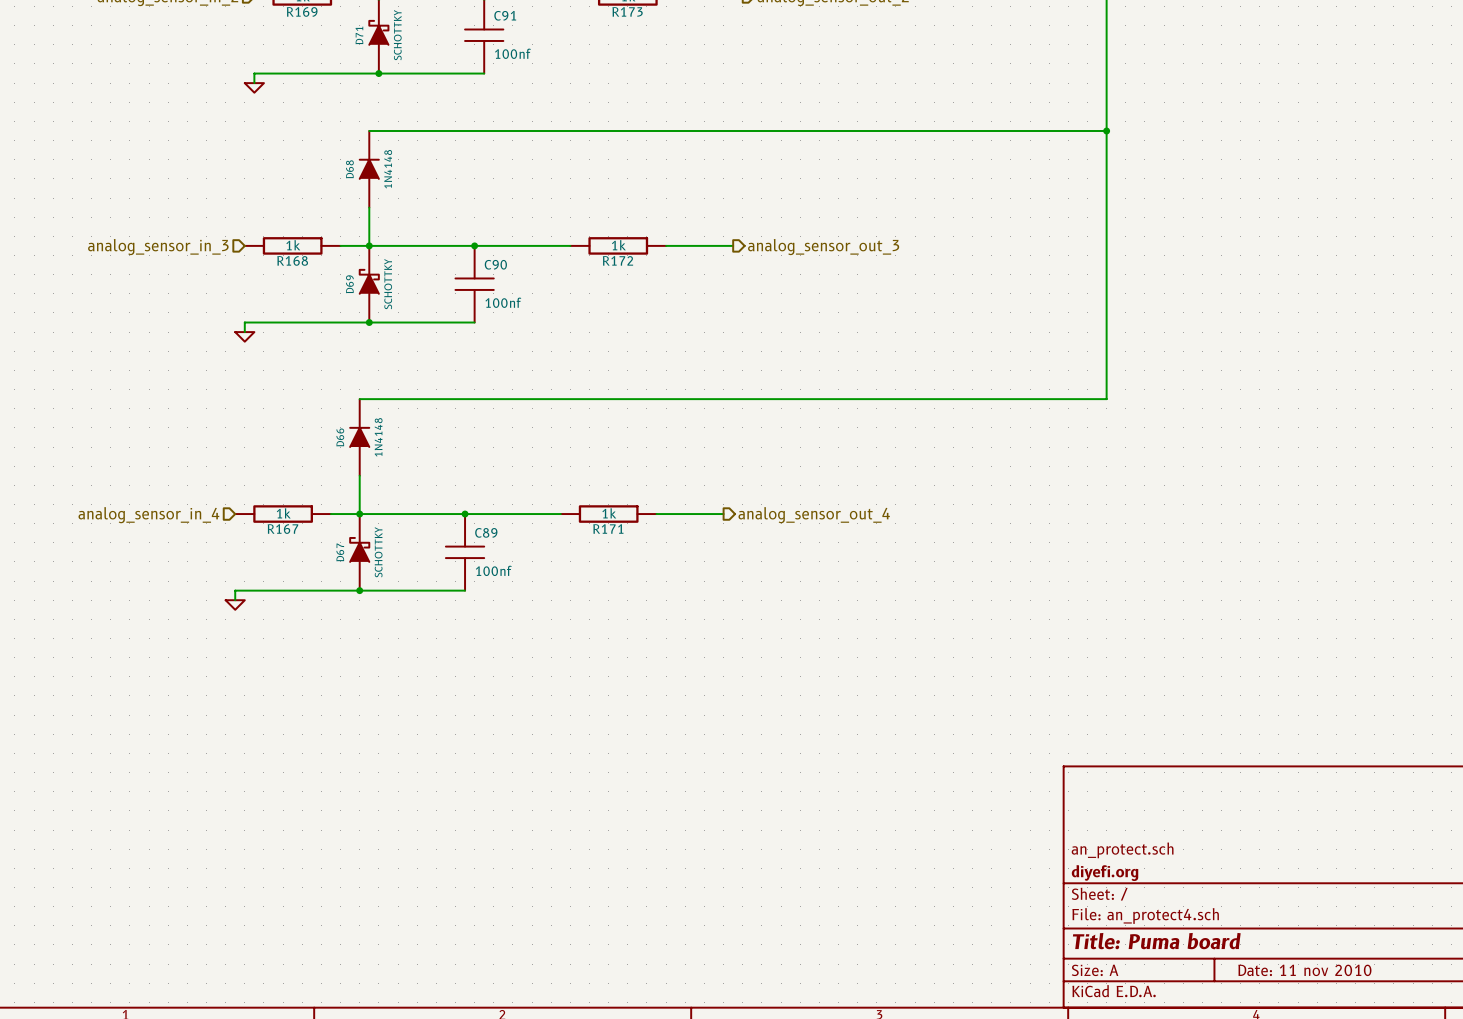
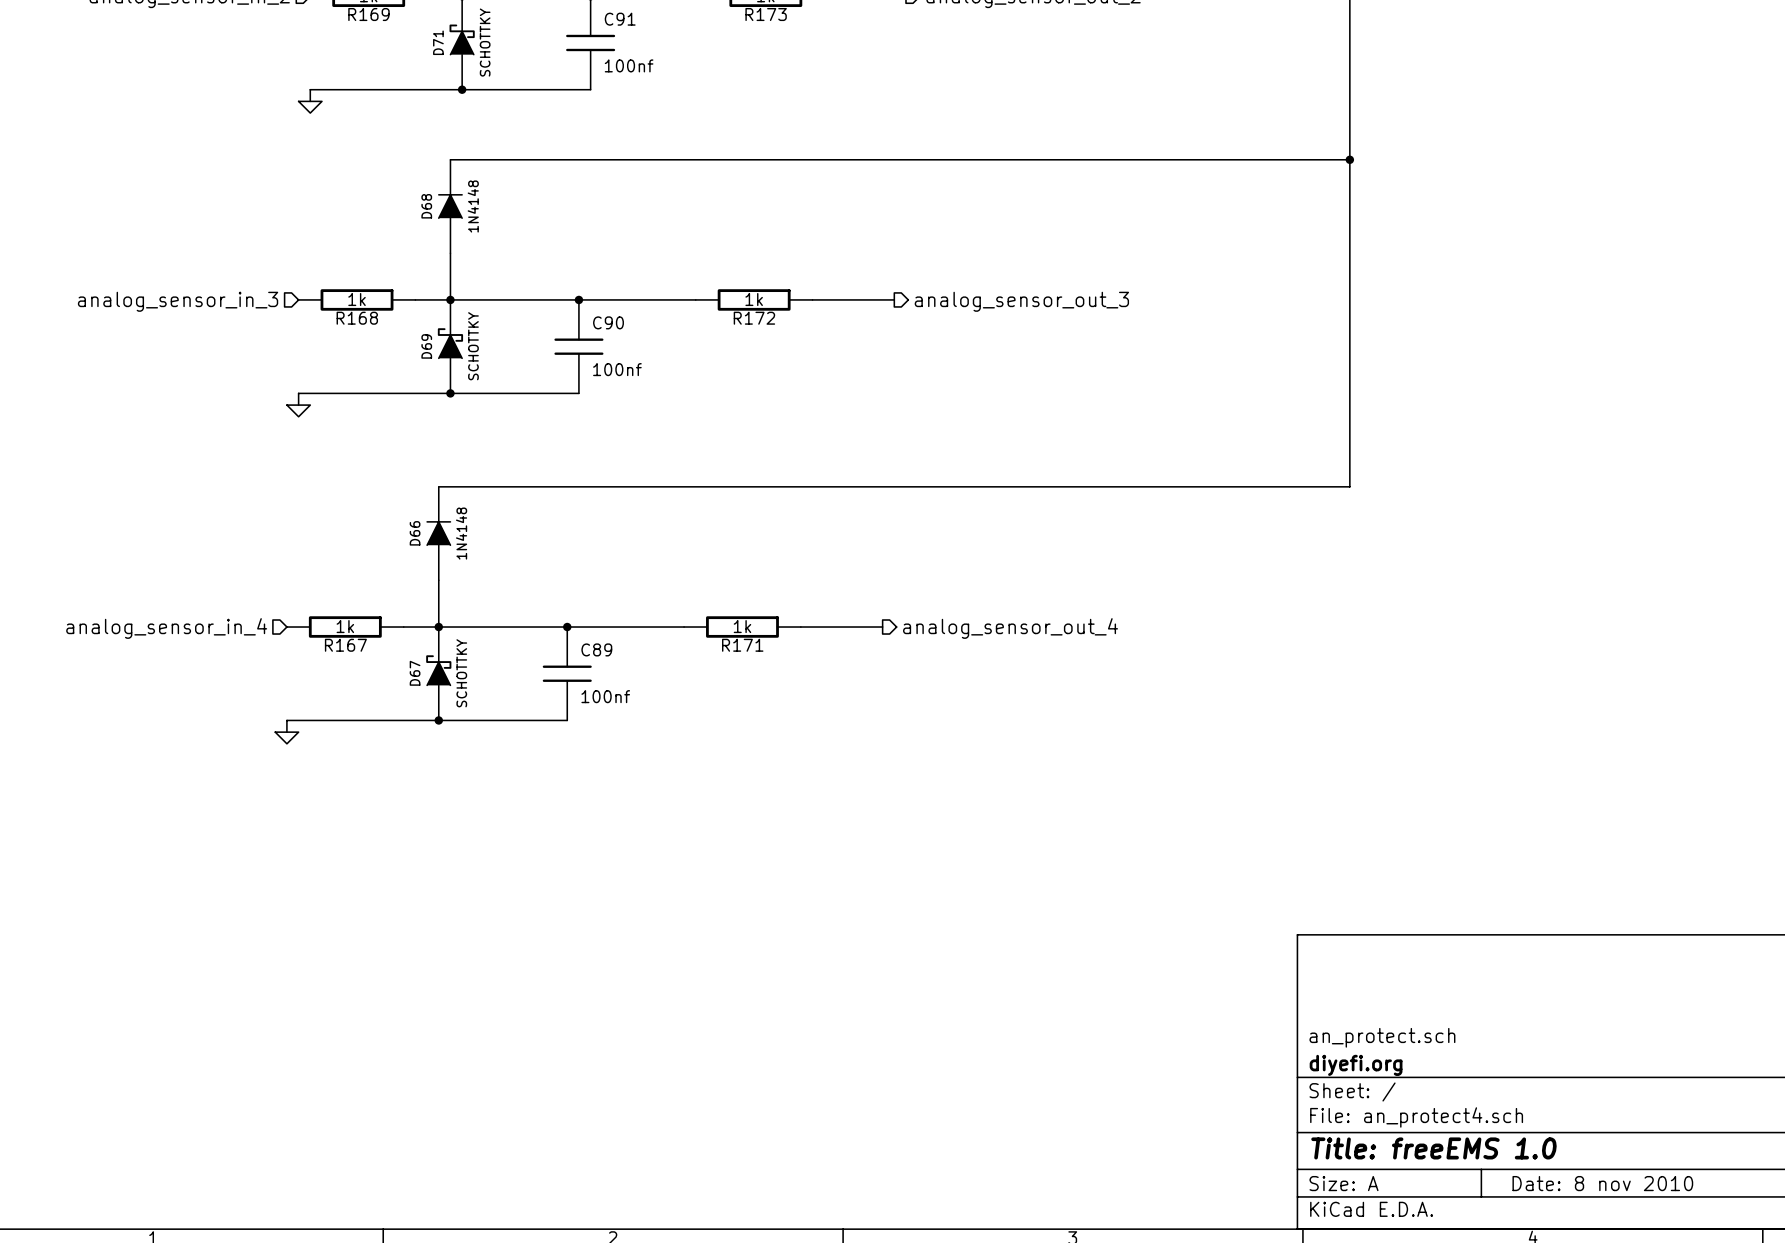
title block: Title: Puma board (1156, 941) -> Title: freeEMS 1.0 (1433, 1148)
title block: Date: 11 nov 2010 (1304, 970) -> Date: 8 nov 2010 (1602, 1183)

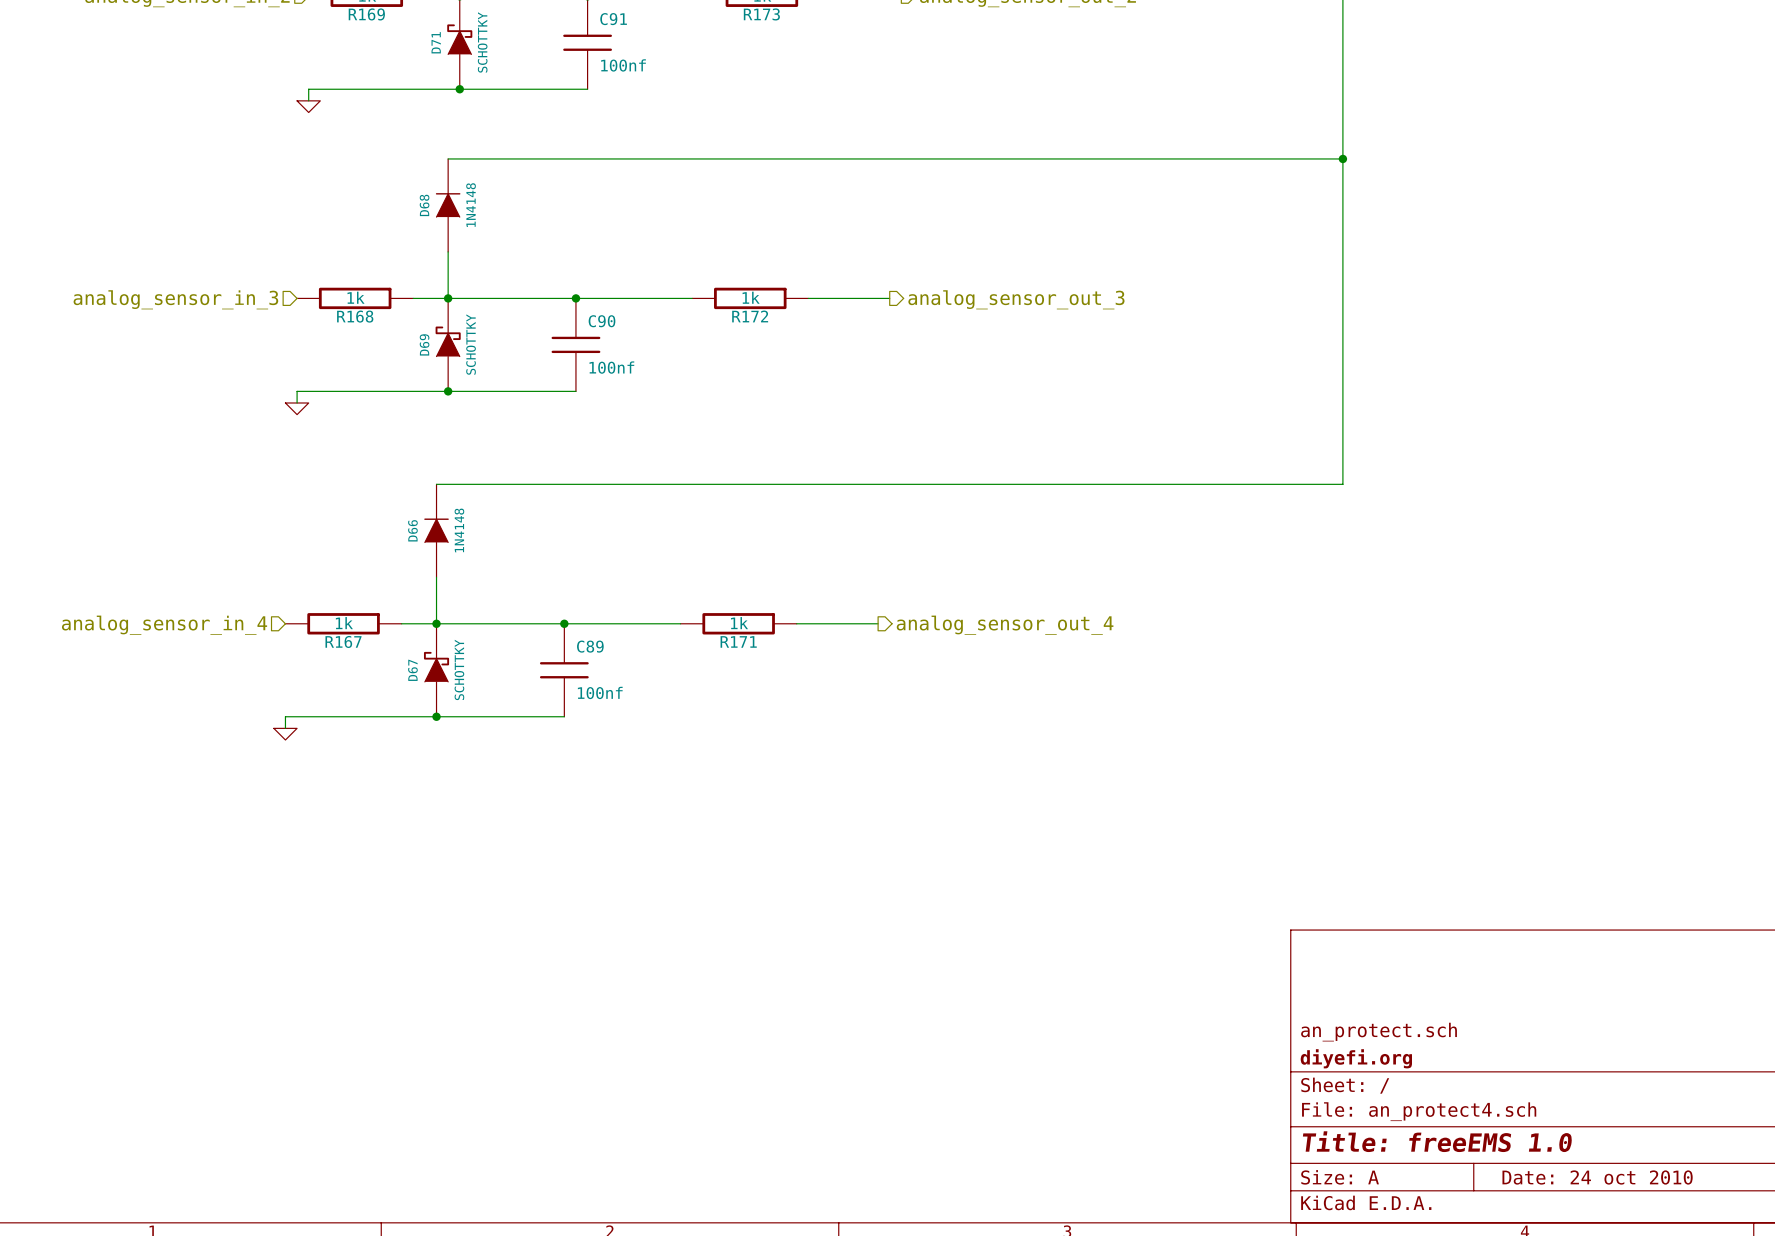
title block: Date: 8 nov 2010 (1602, 1183) -> Date: 24 oct 2010 (1597, 1177)

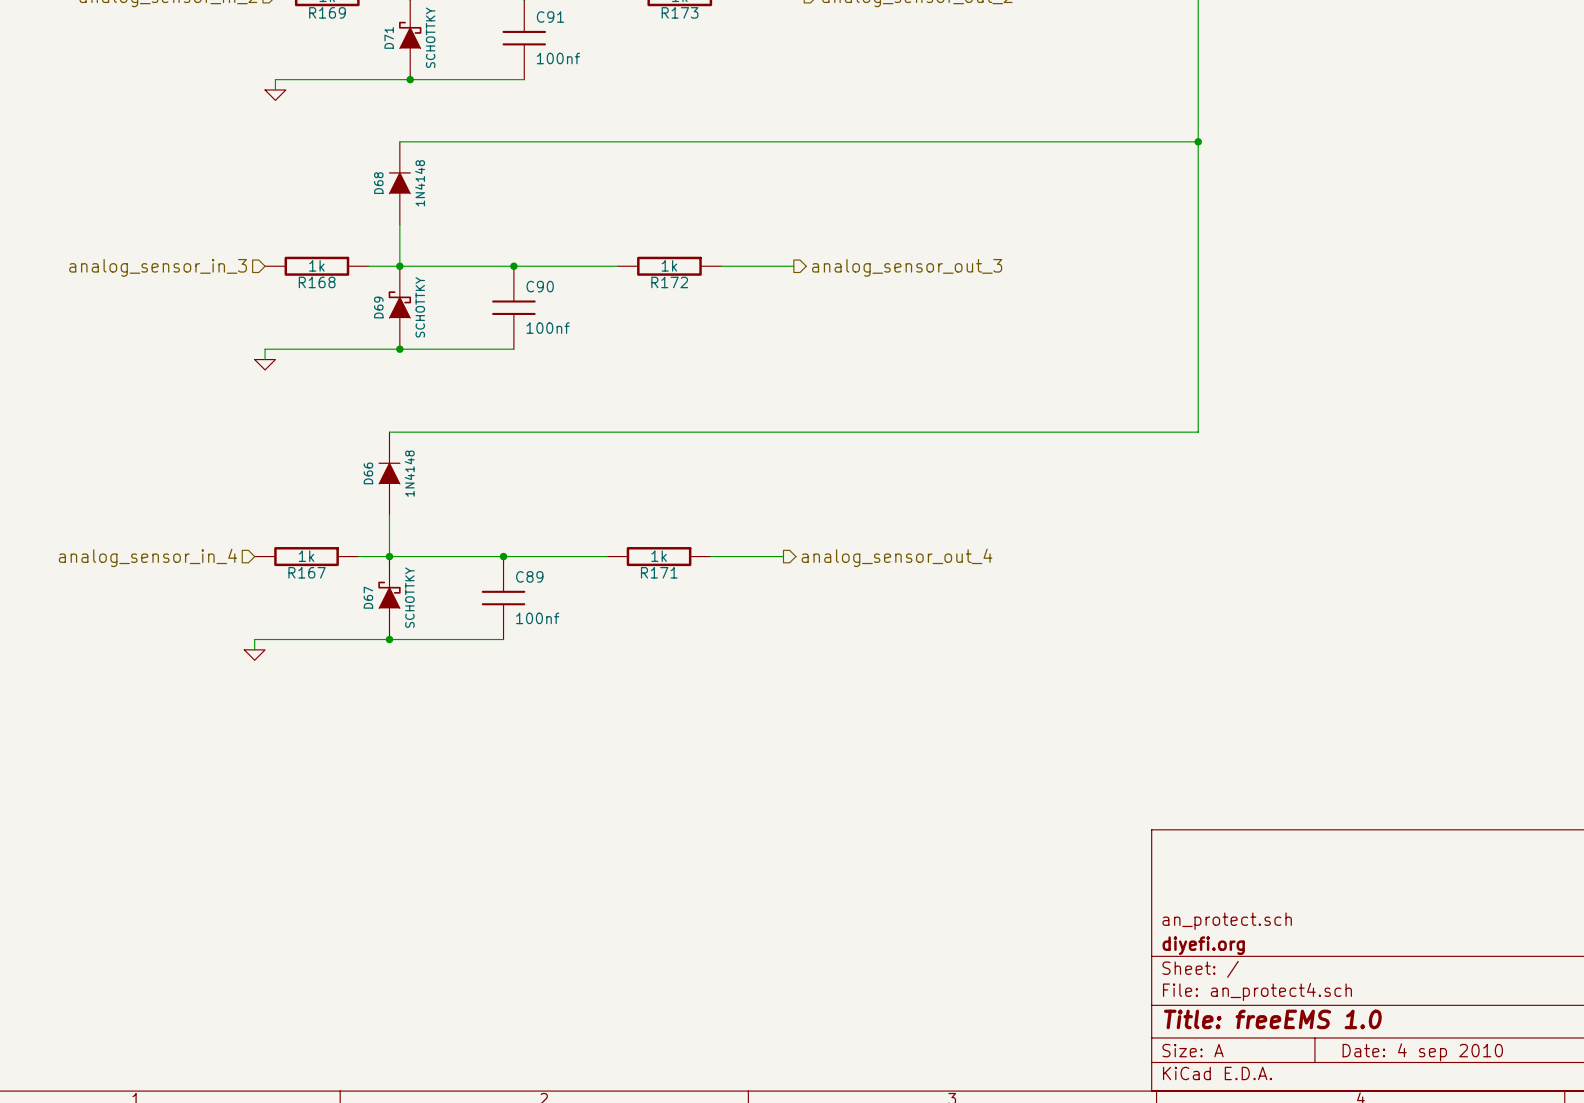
title block: Date: 24 oct 2010 (1597, 1177) -> Date: 4 sep 2010 (1422, 1052)

